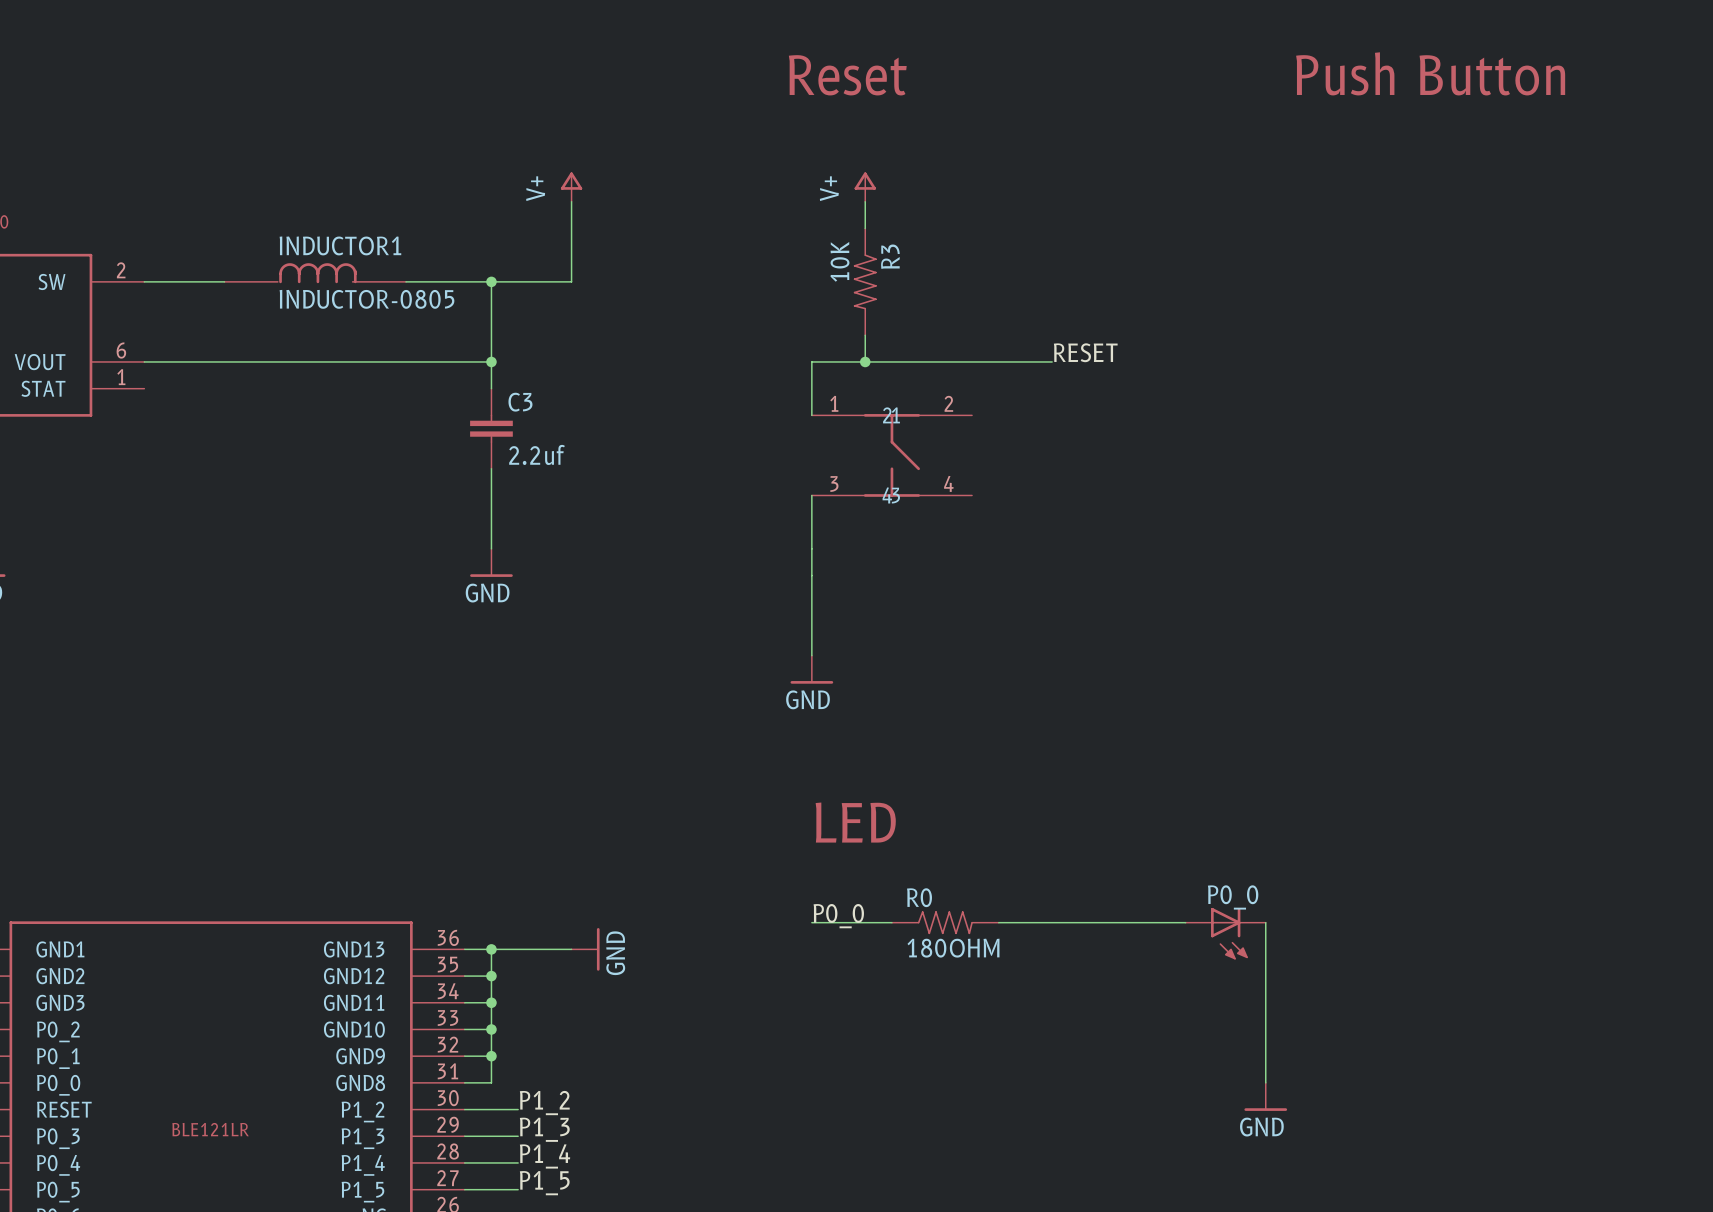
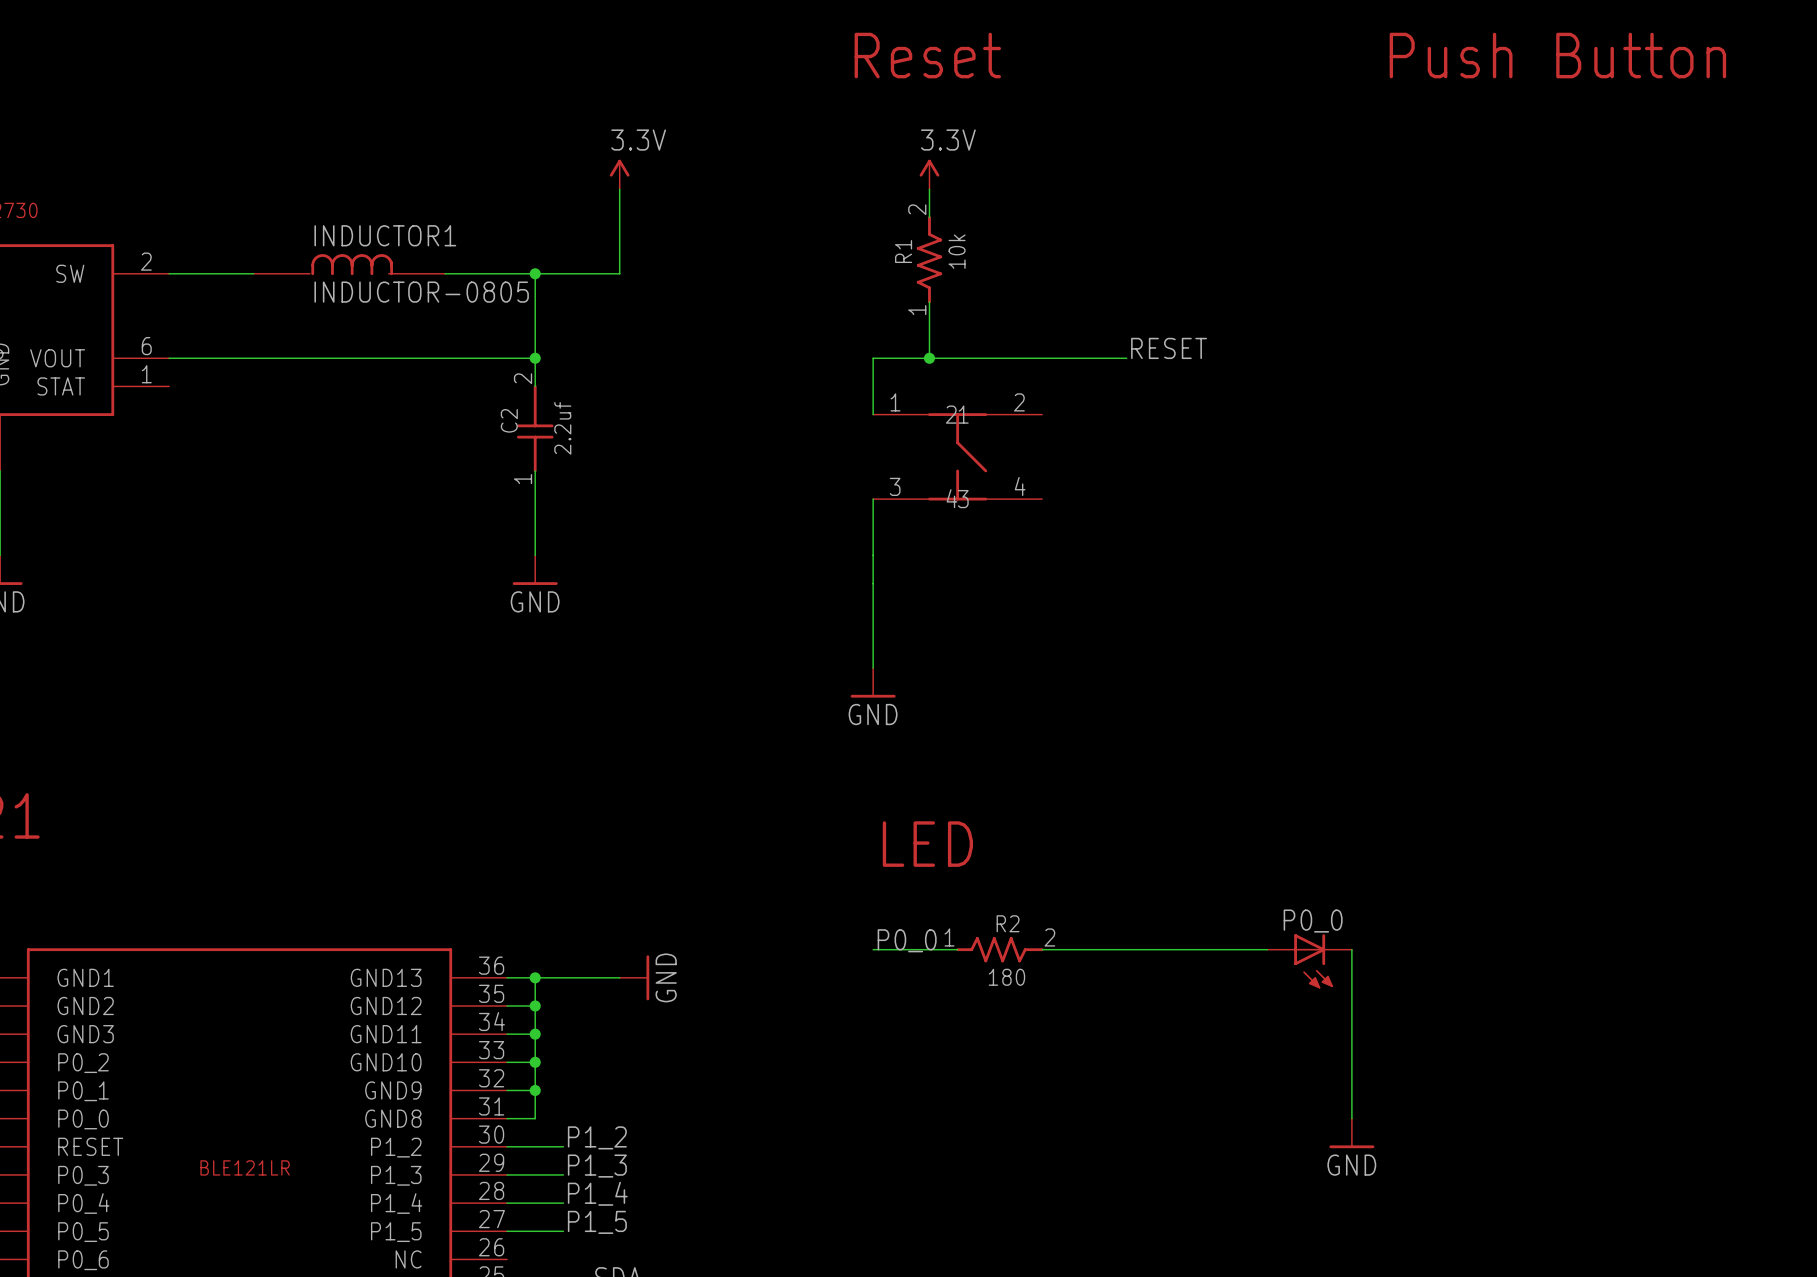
power symbol: V+ (571, 187) -> 3.3V (619, 174)
power symbol: V+ (865, 187) -> 3.3V (929, 174)
R1: none -> 10k (929, 259)
R3: 10K (865, 281) -> none
C3: 2.2uf (491, 428) -> none
C2: none -> 2.2uf (535, 428)
R2: none -> 180 (999, 949)
R0: 180OHM (945, 922) -> none

